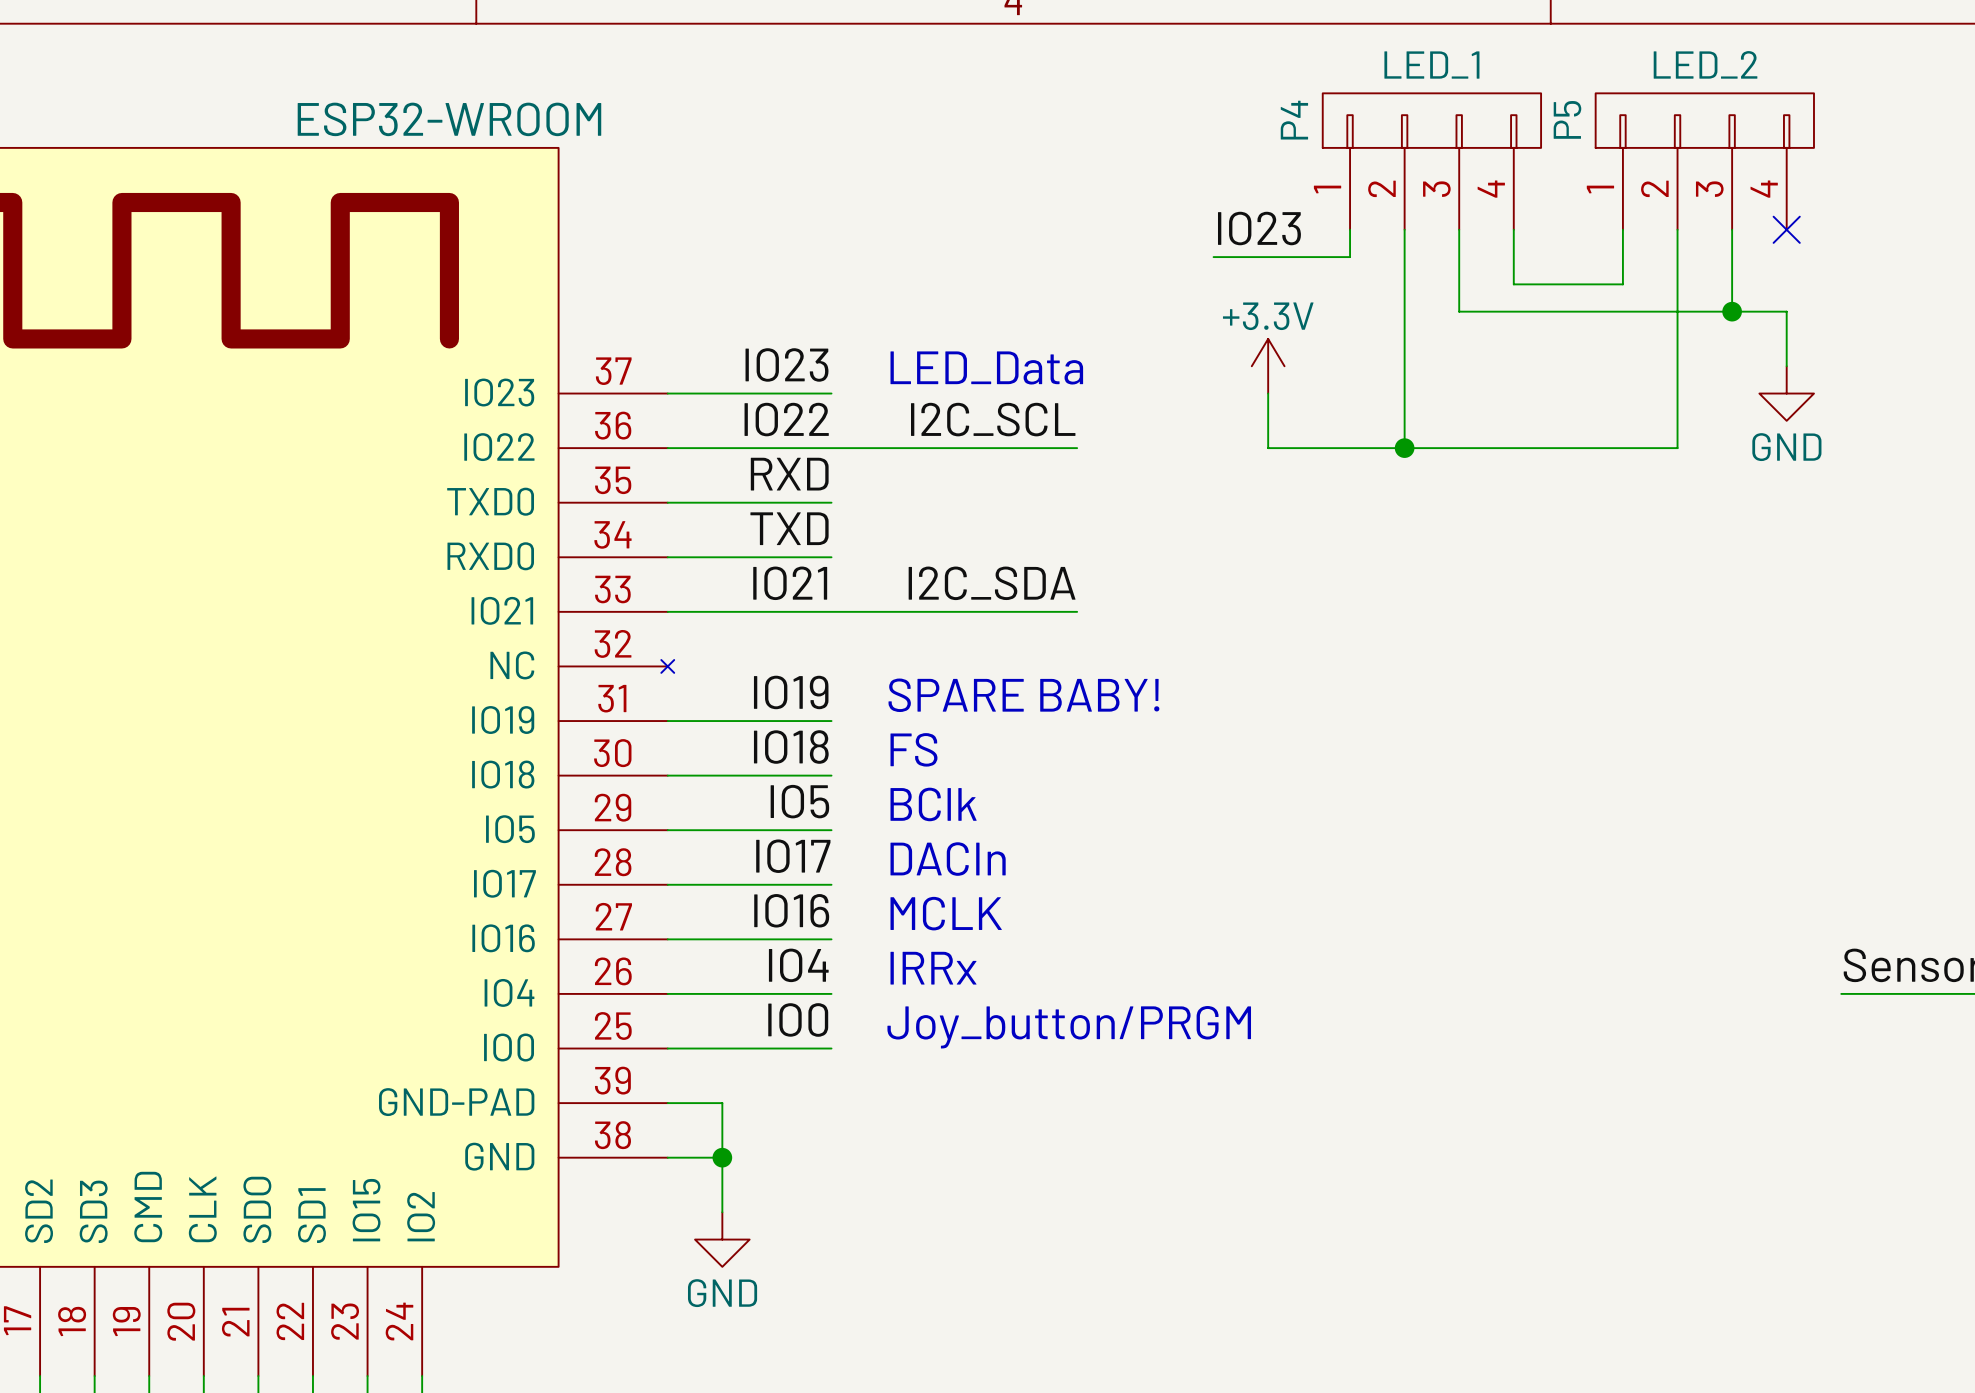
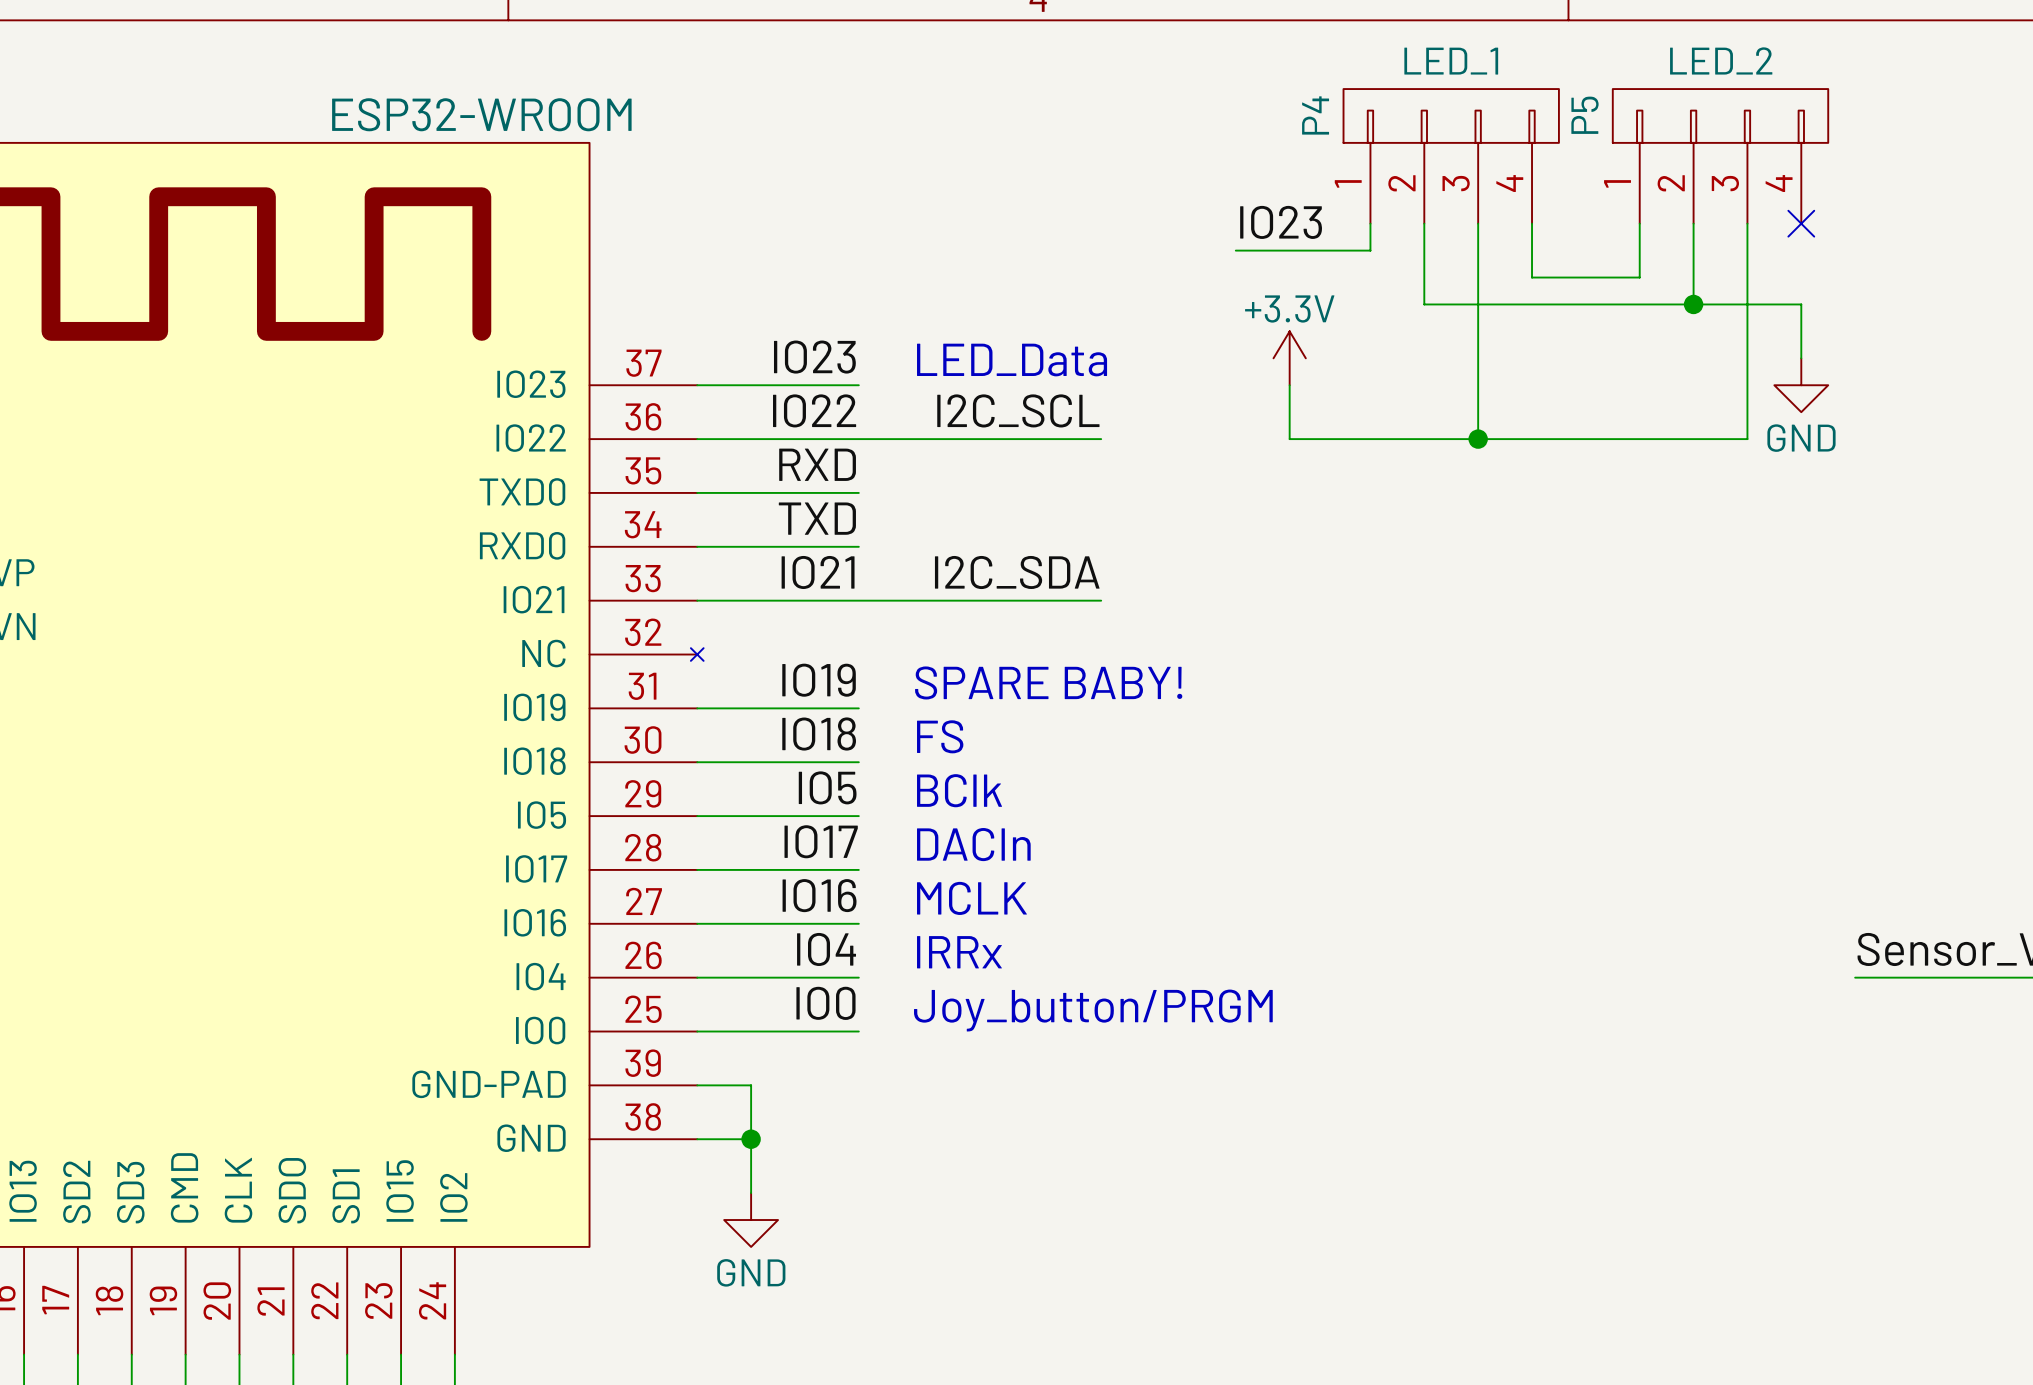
wire: (1404, 311) (1404, 448) -> (1424, 304) (1478, 304) (1478, 439)
wire: (1677, 311) (1677, 448) -> (1747, 304) (1747, 439) (1693, 439)
junction position: (1732, 311) -> (1693, 304)
junction position: (1404, 448) -> (1478, 439)

